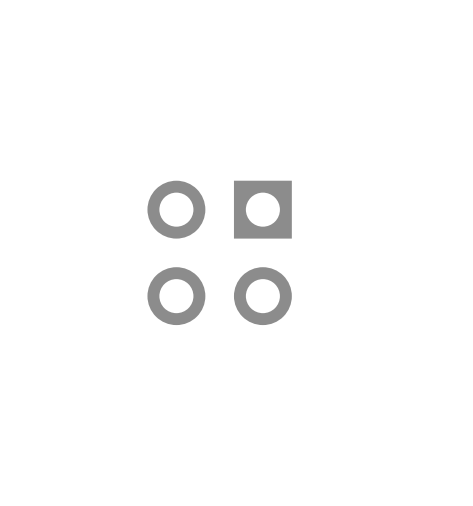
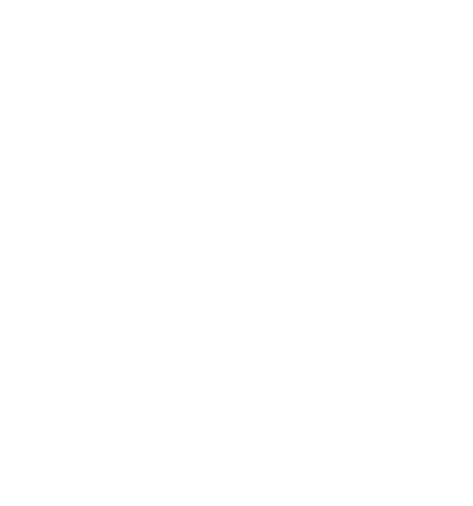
part: (219, 252) -> none

